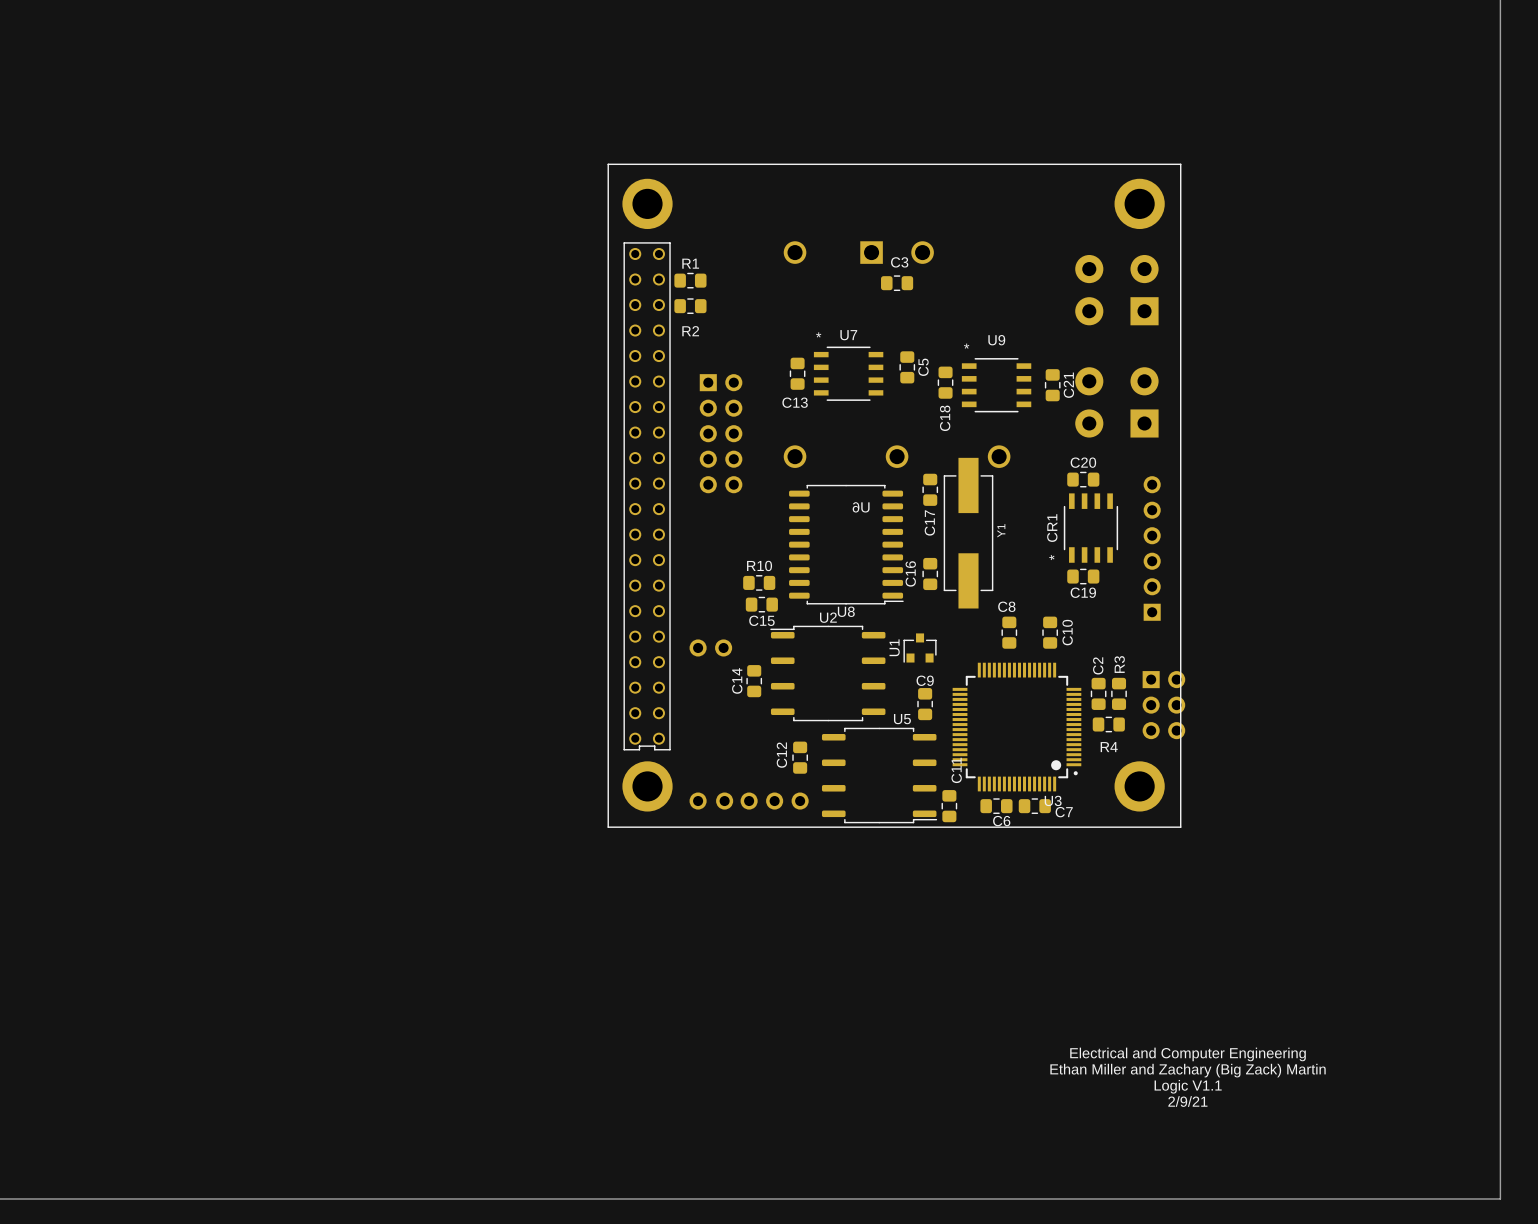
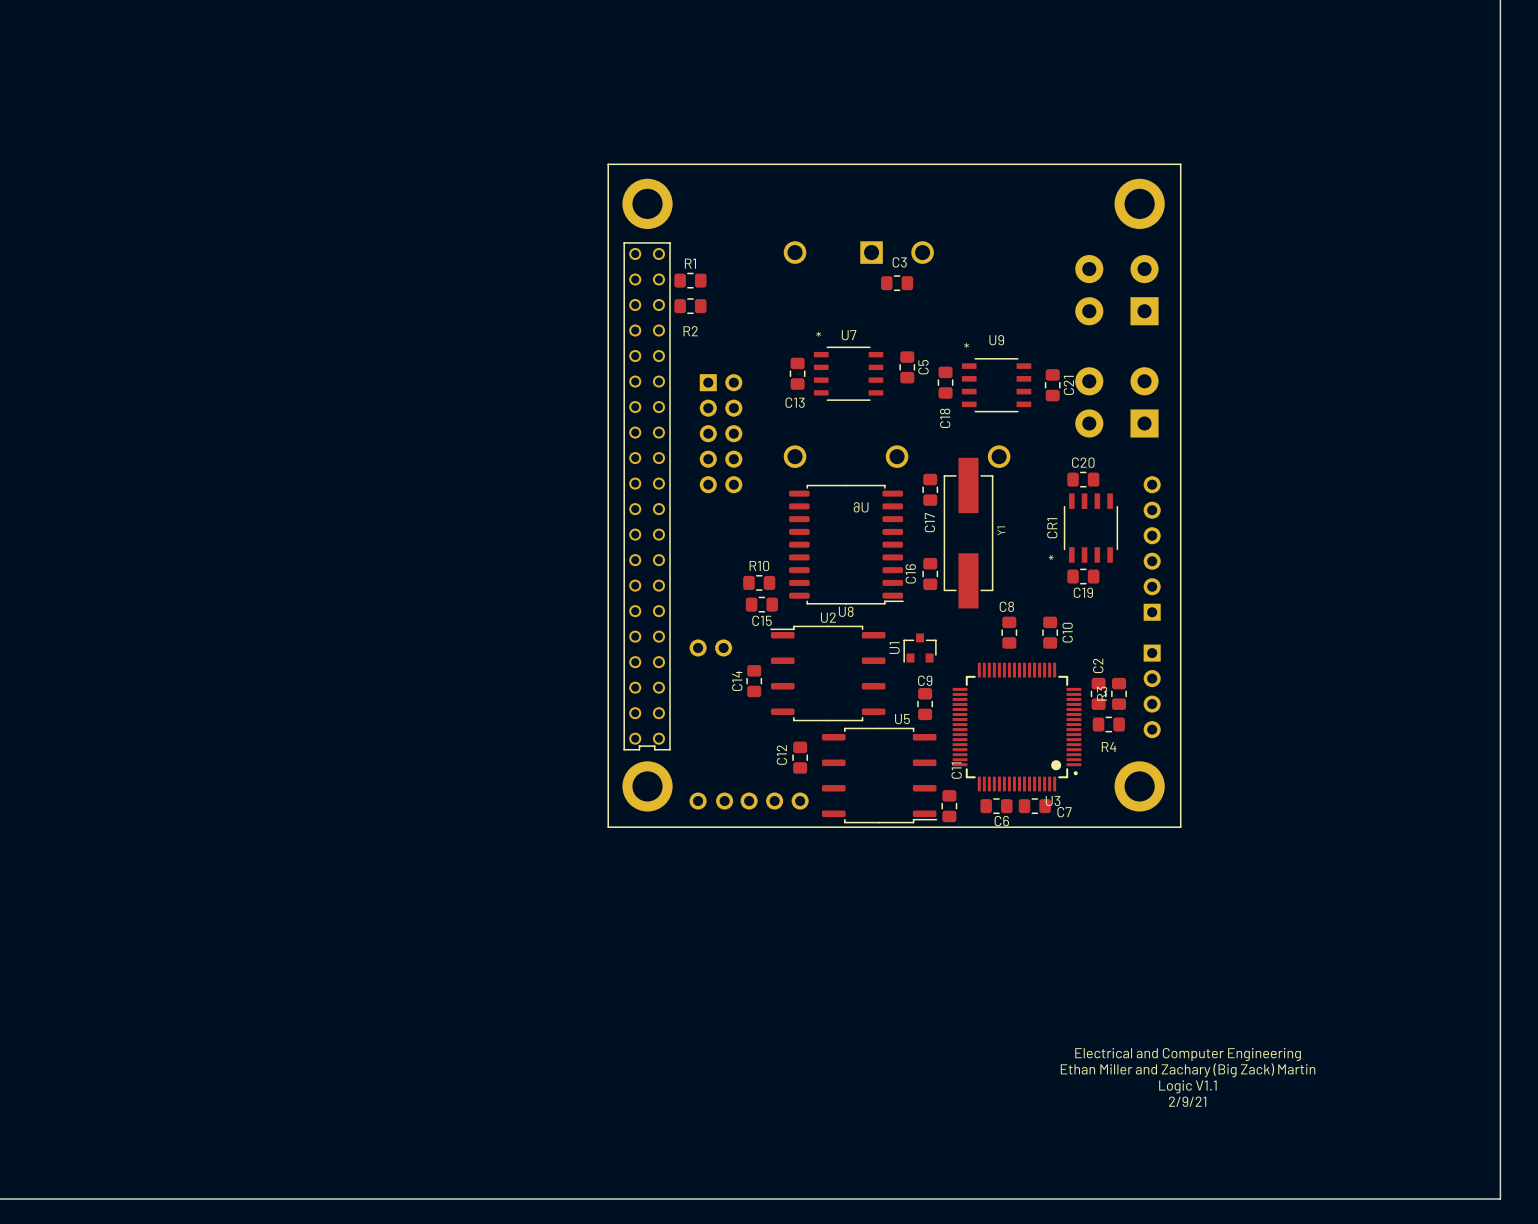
R3 name position: R3 (1119, 664) -> R3 (1102, 693)
part: none -> (1152, 691)
part: (1163, 705) -> none

